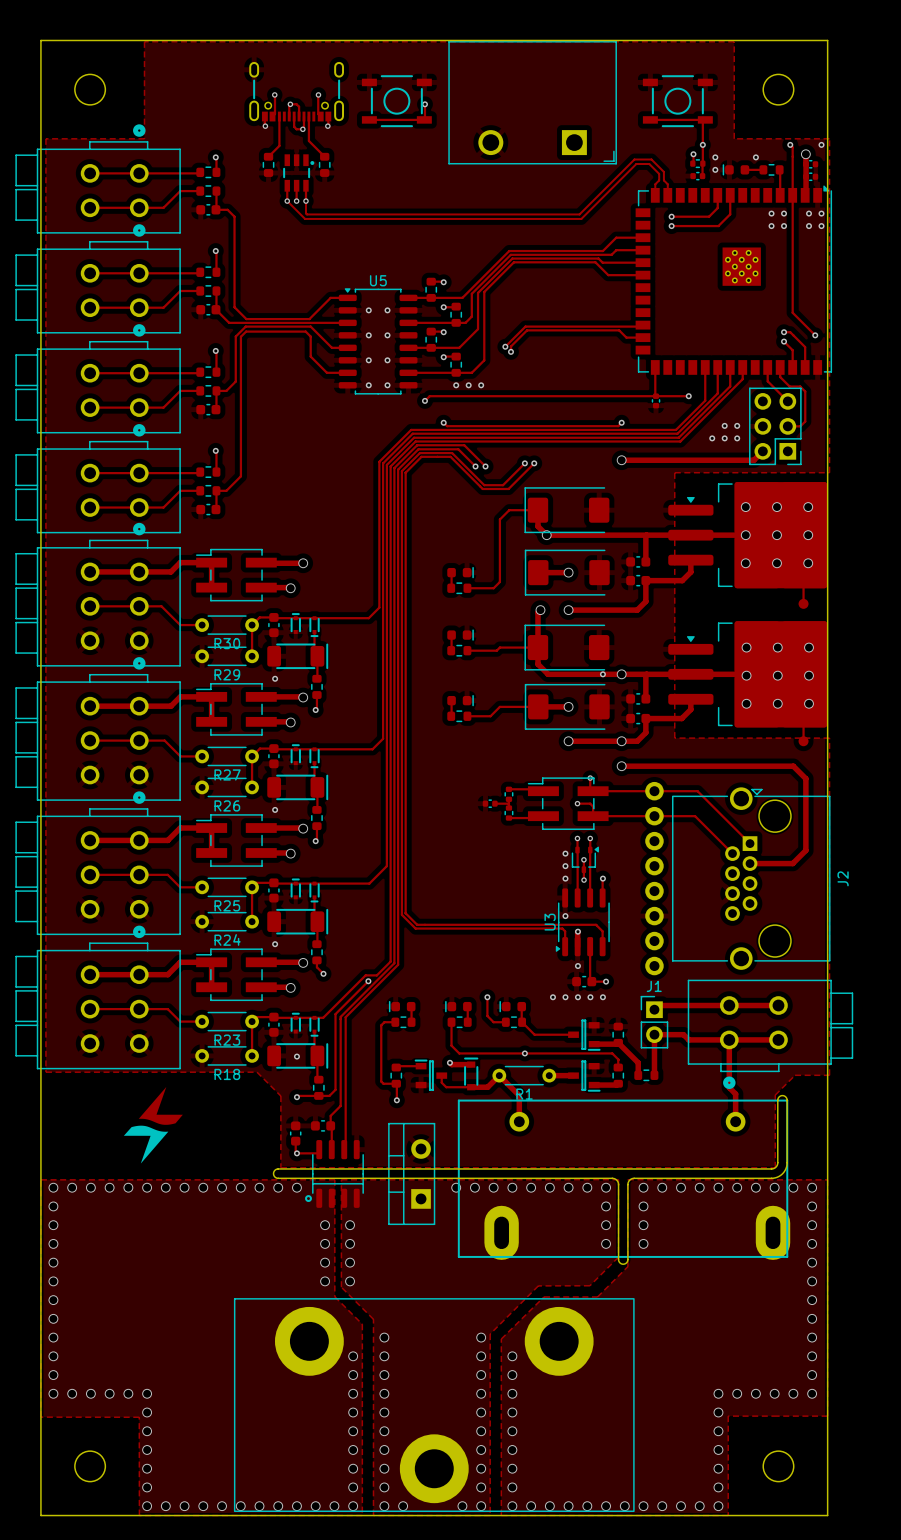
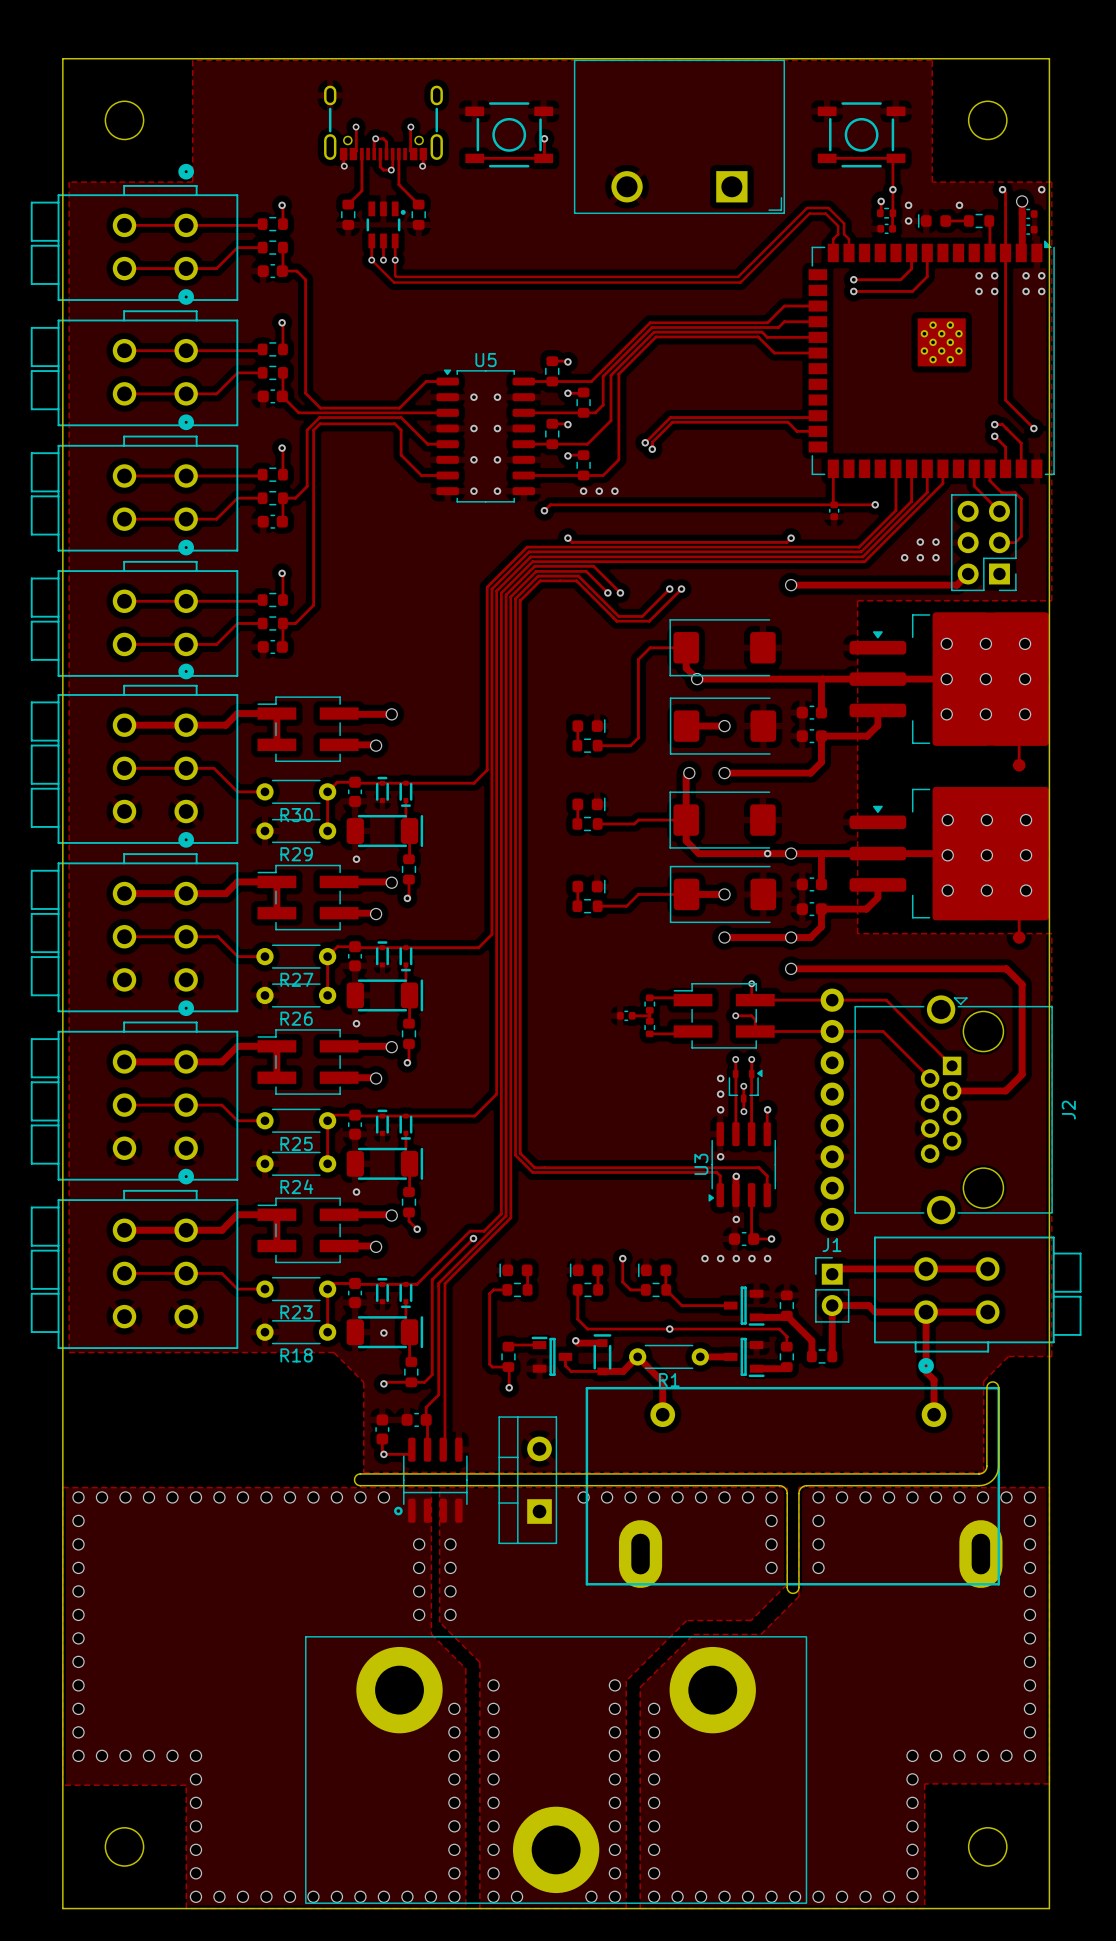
drawing: [123, 1086, 183, 1164] -> none

